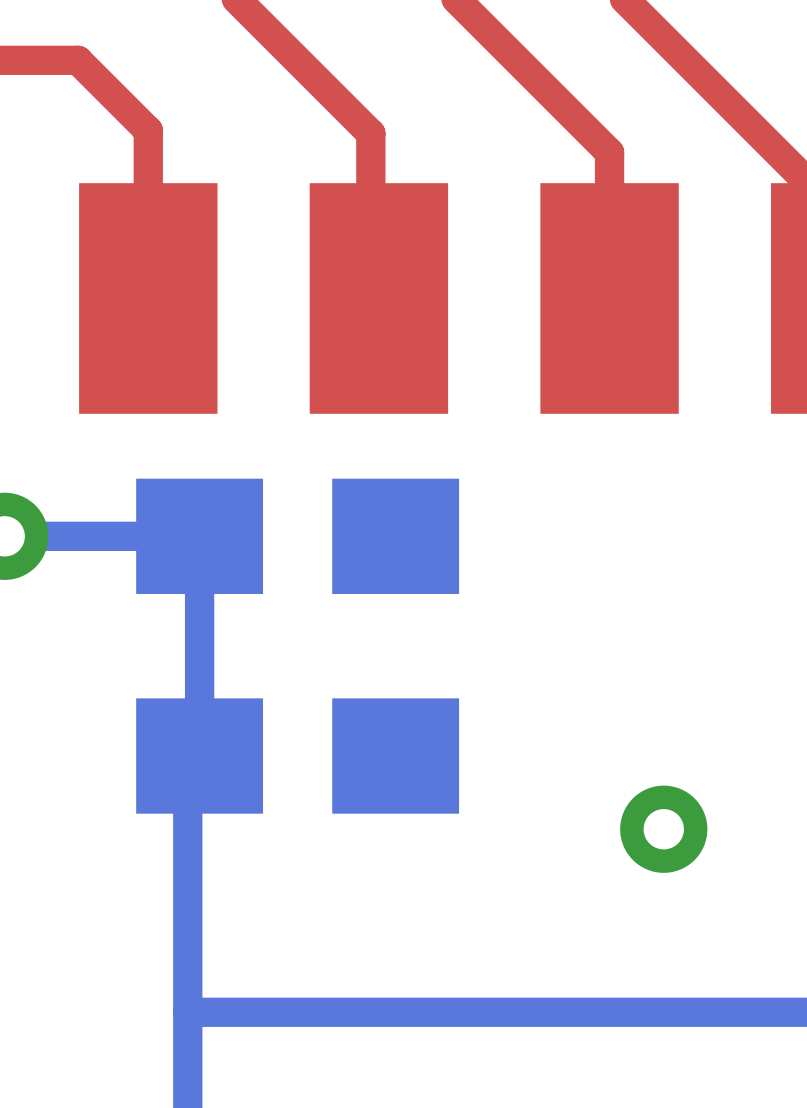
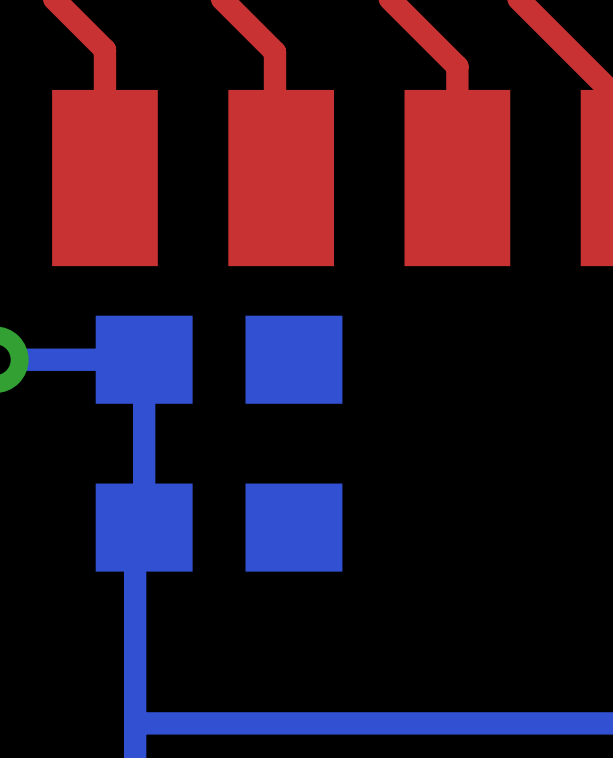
via: (663, 829) -> none

